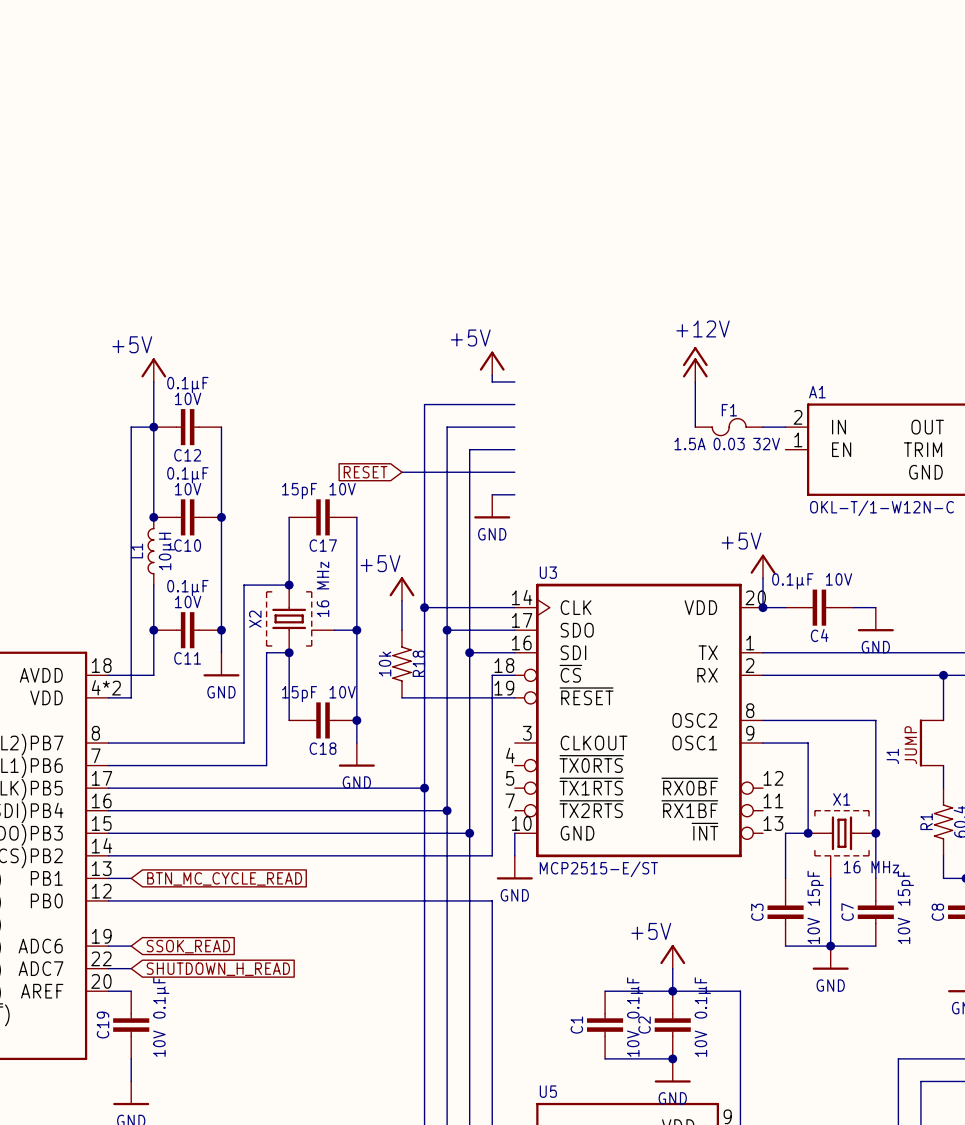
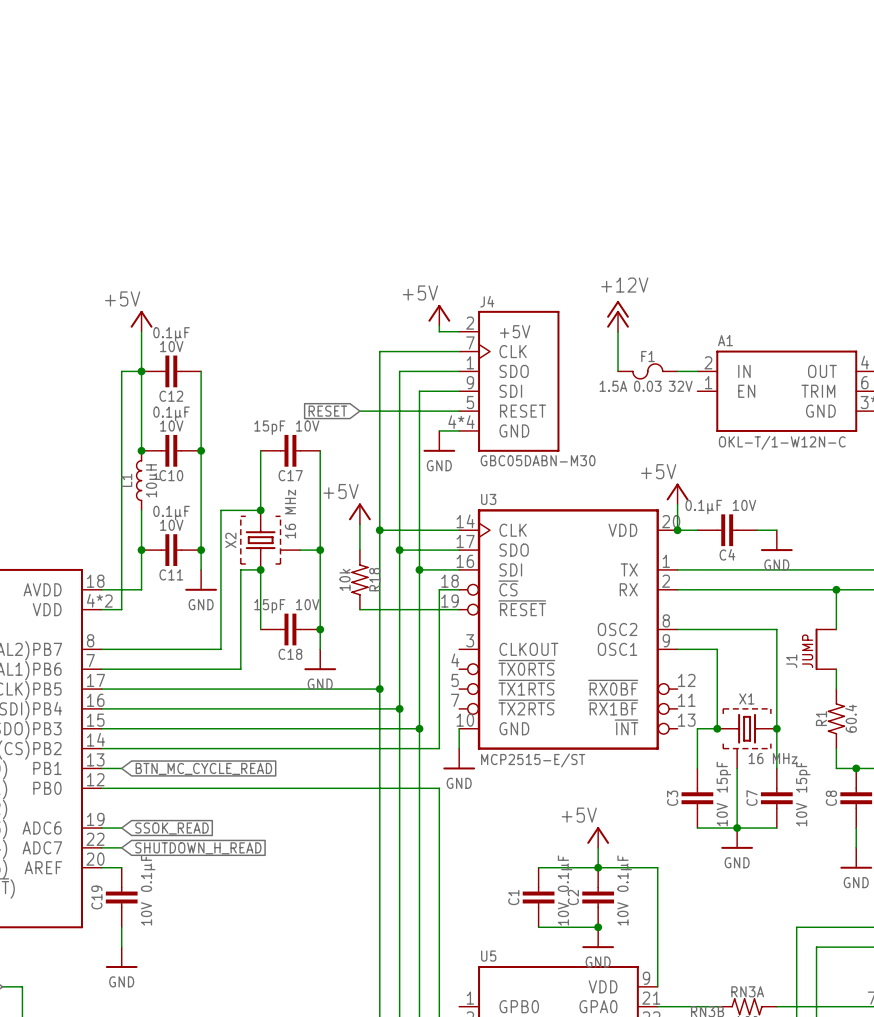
J4: none -> (509, 381)

